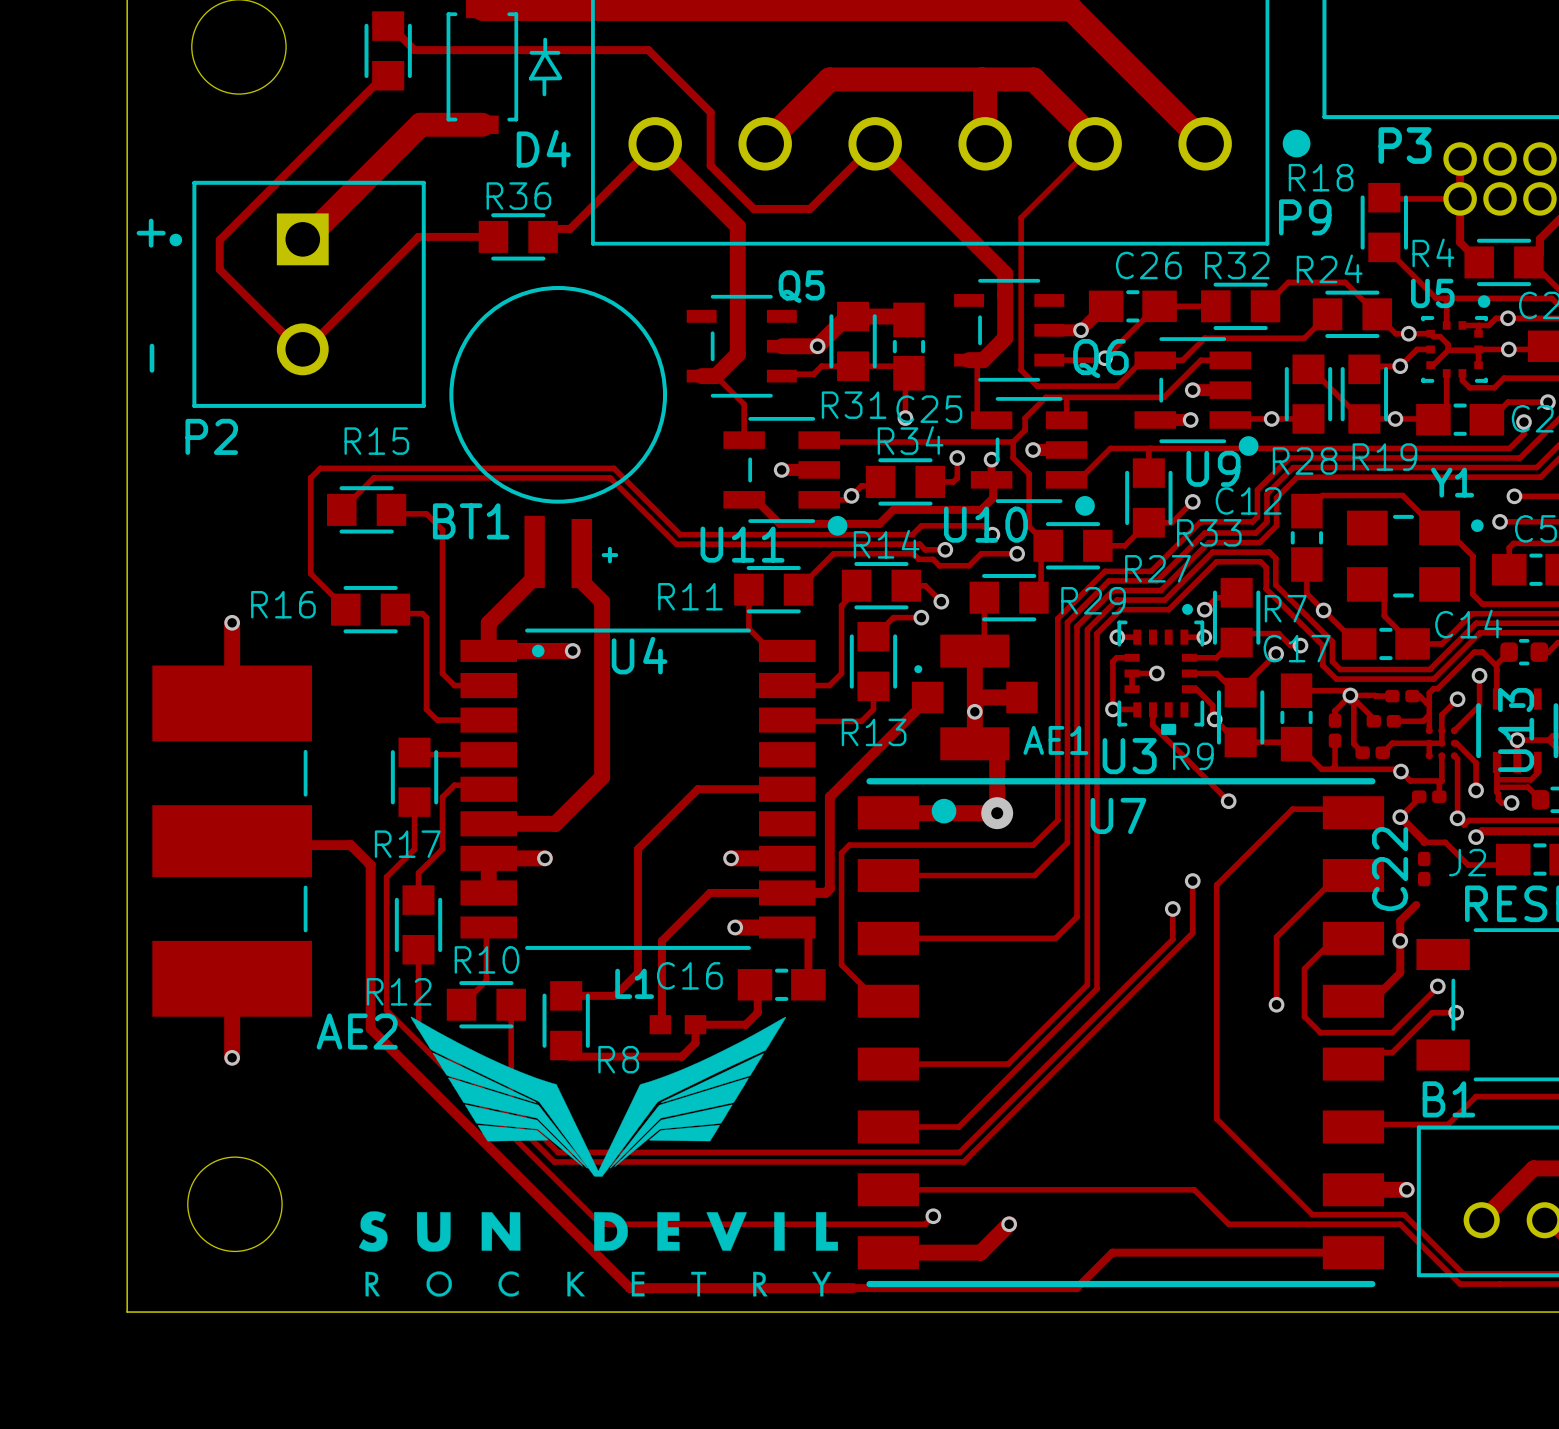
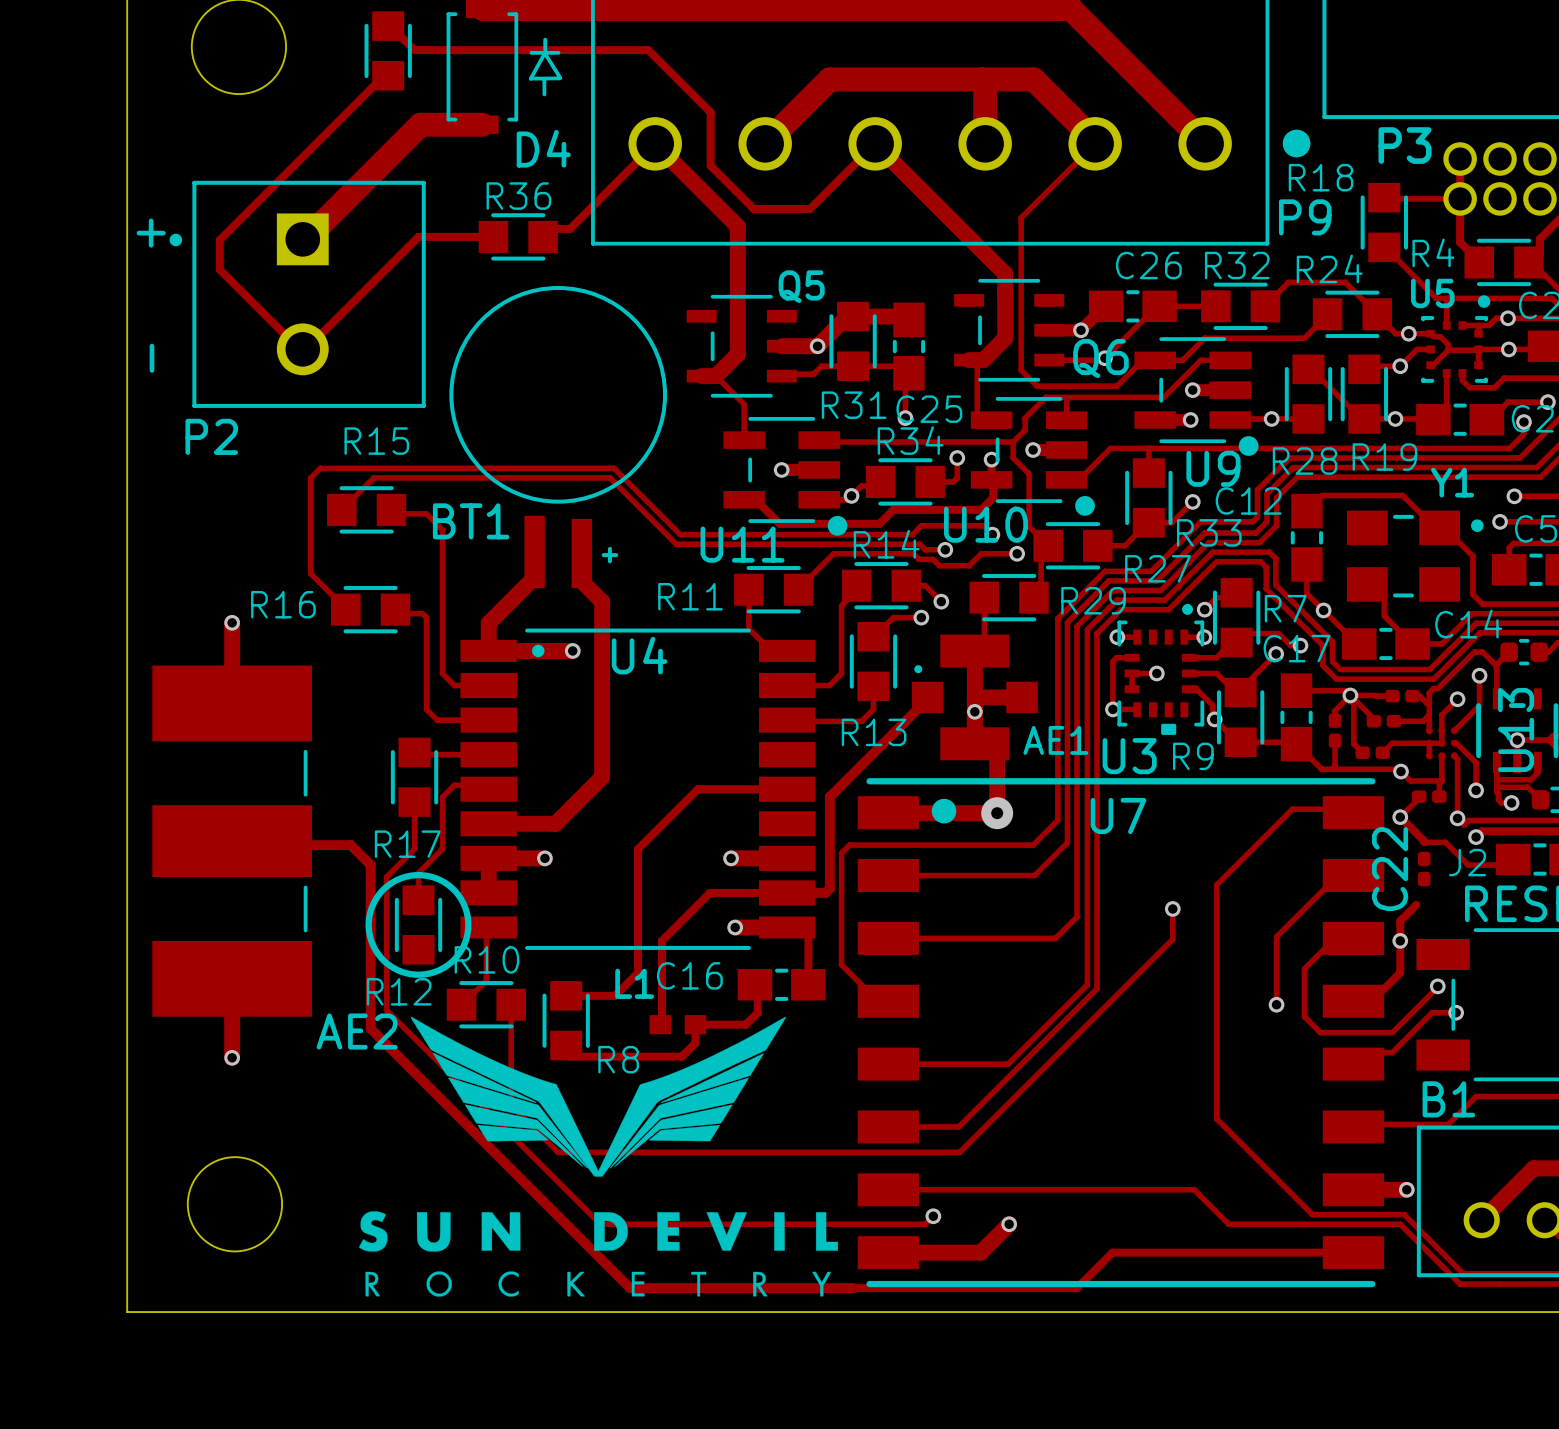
track: (1152, 709) (1152, 725) (1228, 801) -> none
via: (1228, 801) -> none
drawing: none -> [365, 871, 472, 978]
track: (1192, 881) (1192, 932) (963, 1161) (554, 1161) (418, 1026) -> none
via: (1192, 881) -> none
track: (418, 949) (418, 1024) -> none

